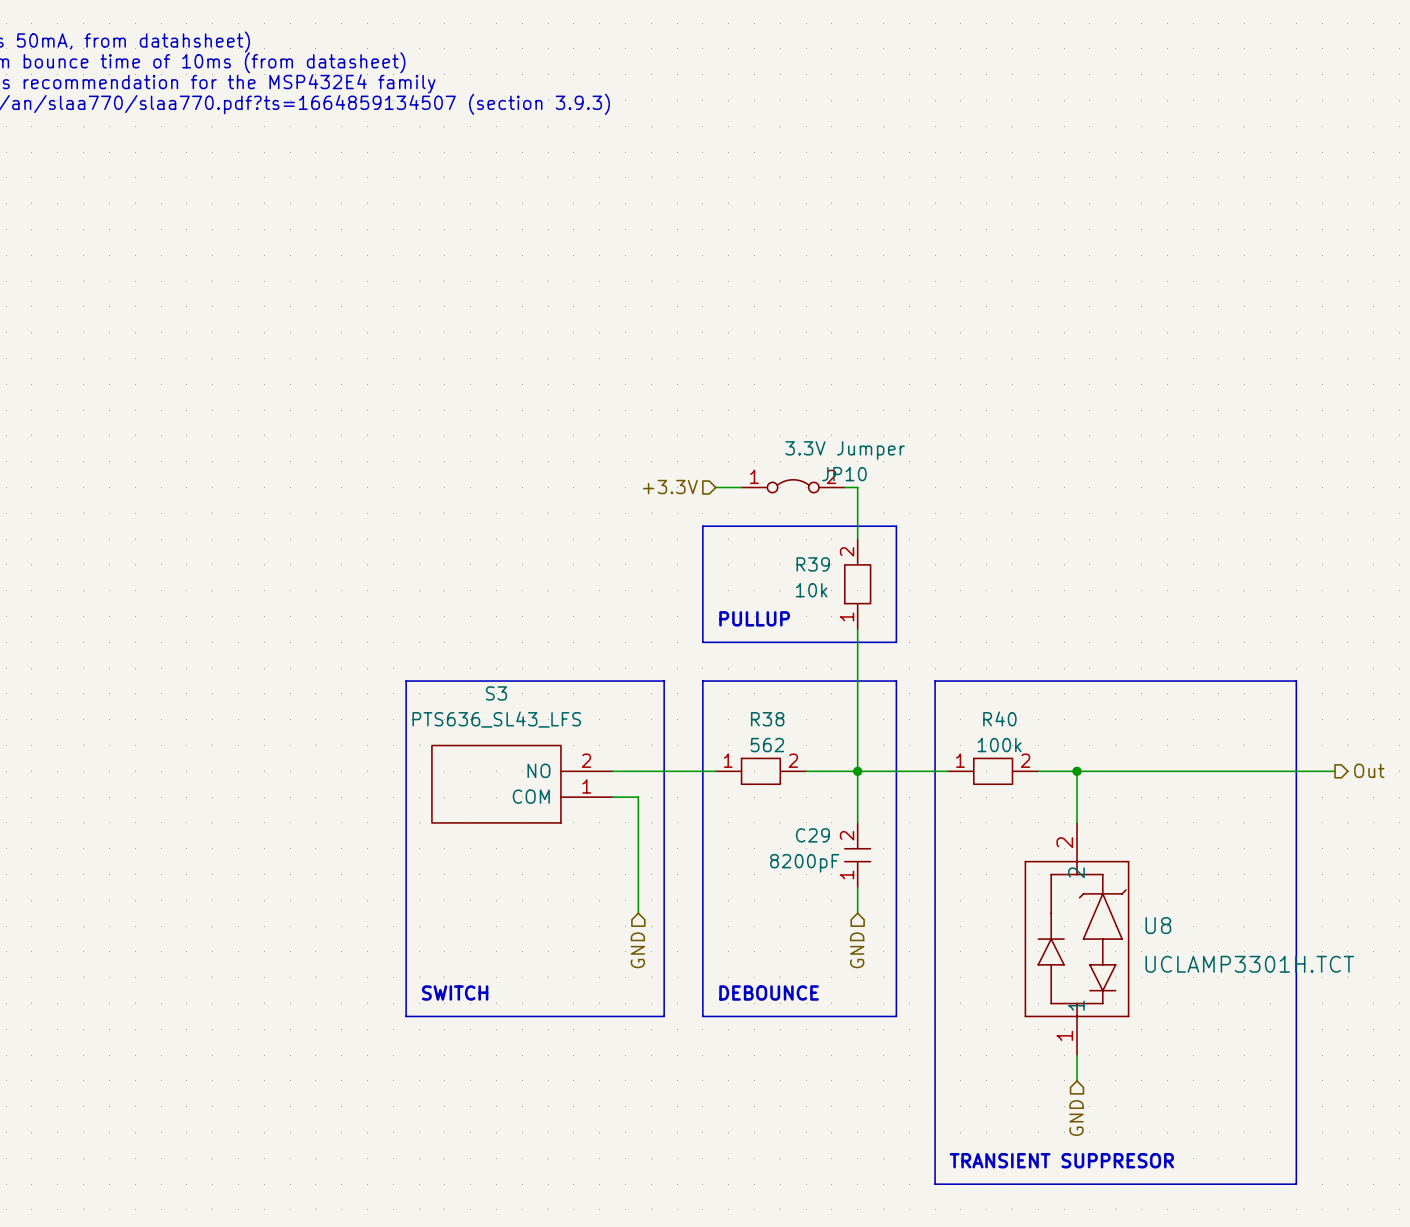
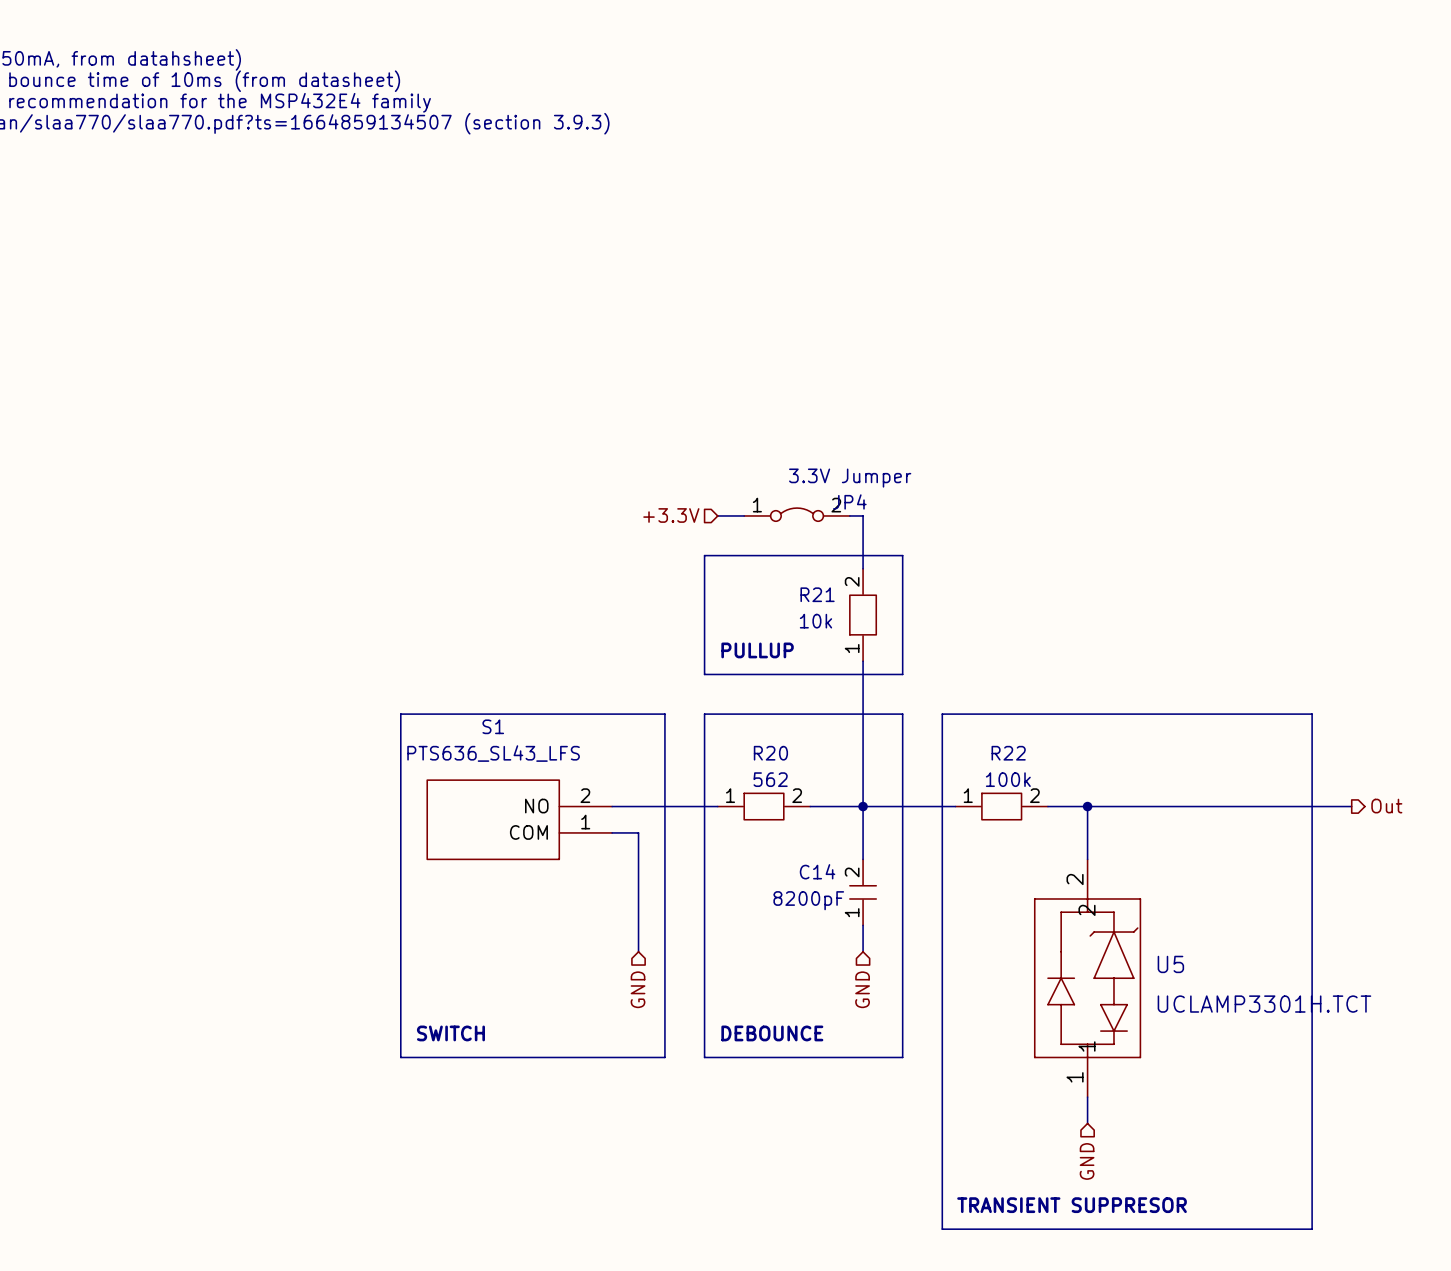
JP10 name: JP10 (844, 474) -> JP4 (849, 501)
R39 name: R39 (813, 564) -> R21 (817, 594)
S3 name: S3 (496, 693) -> S1 (493, 726)
R40 name: R40 (999, 718) -> R22 (1008, 753)
R38 name: R38 (767, 719) -> R20 (770, 753)
C29 name: C29 (812, 835) -> C14 (817, 871)
U8 name: U8 (1158, 925) -> U5 (1170, 964)

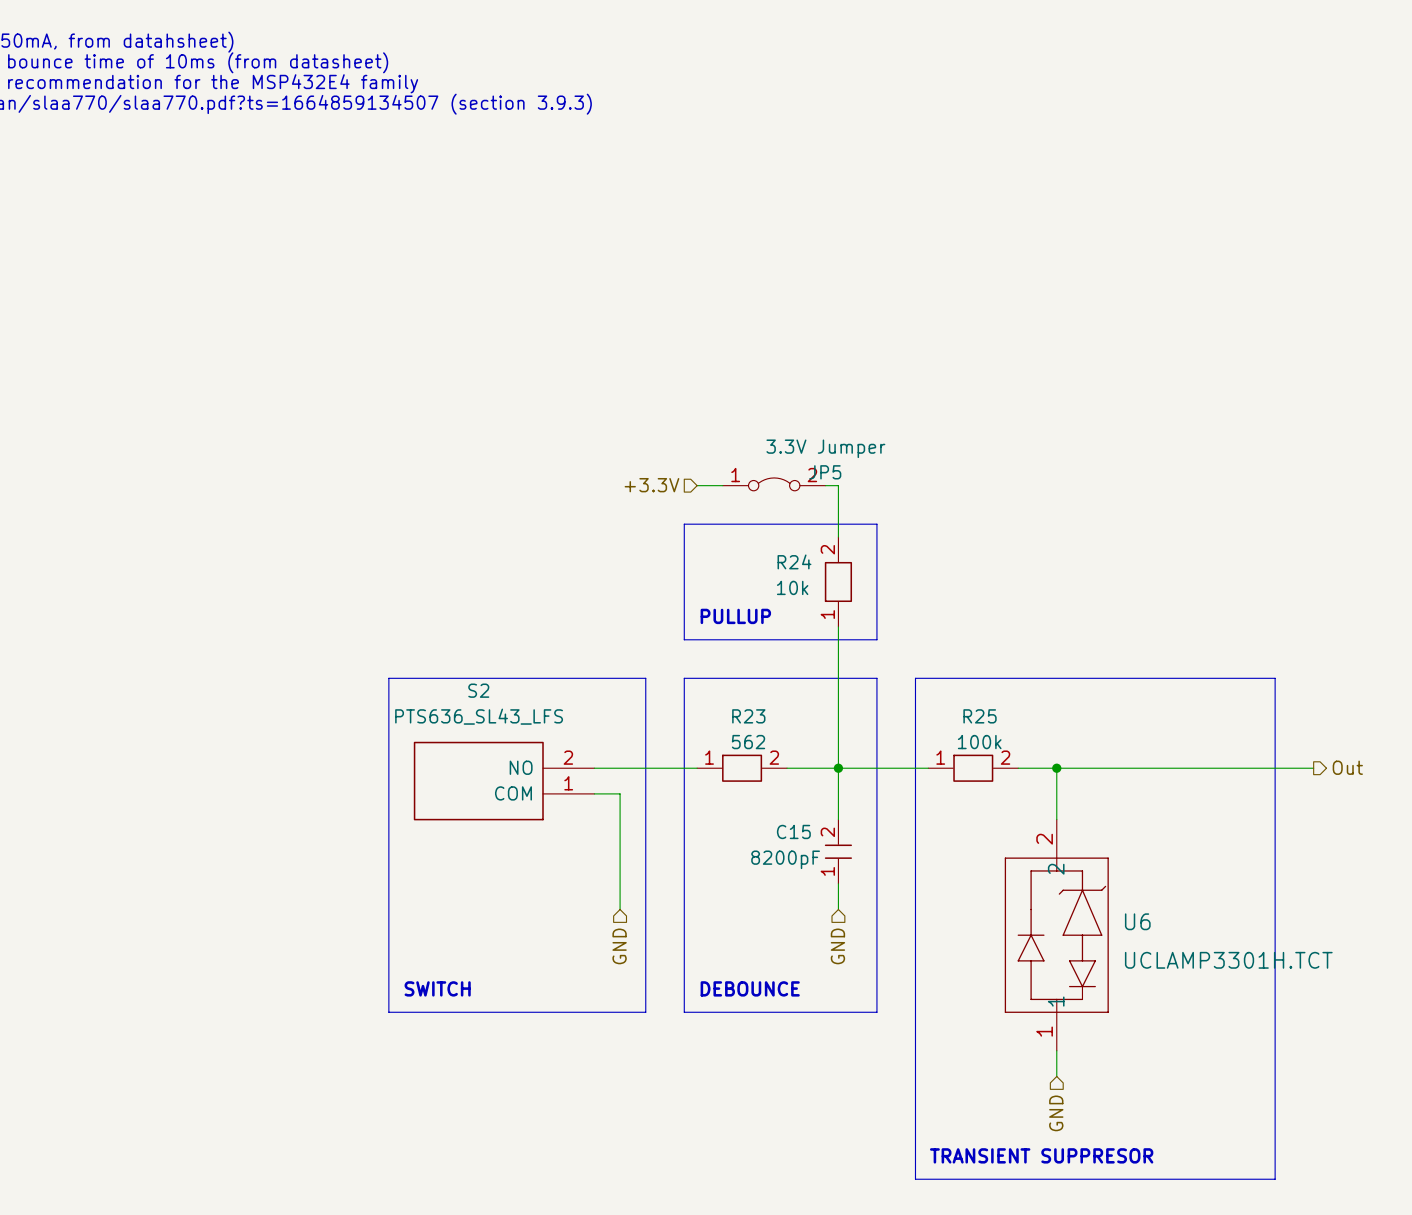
JP4 name: JP4 (849, 501) -> JP5 (825, 472)
R21 name: R21 (817, 594) -> R24 (794, 561)
S1 name: S1 (493, 726) -> S2 (478, 690)
R20 name: R20 (770, 753) -> R23 (748, 716)
R22 name: R22 (1008, 753) -> R25 (980, 716)
C14 name: C14 (817, 871) -> C15 (793, 831)
U5 name: U5 (1170, 964) -> U6 (1137, 921)

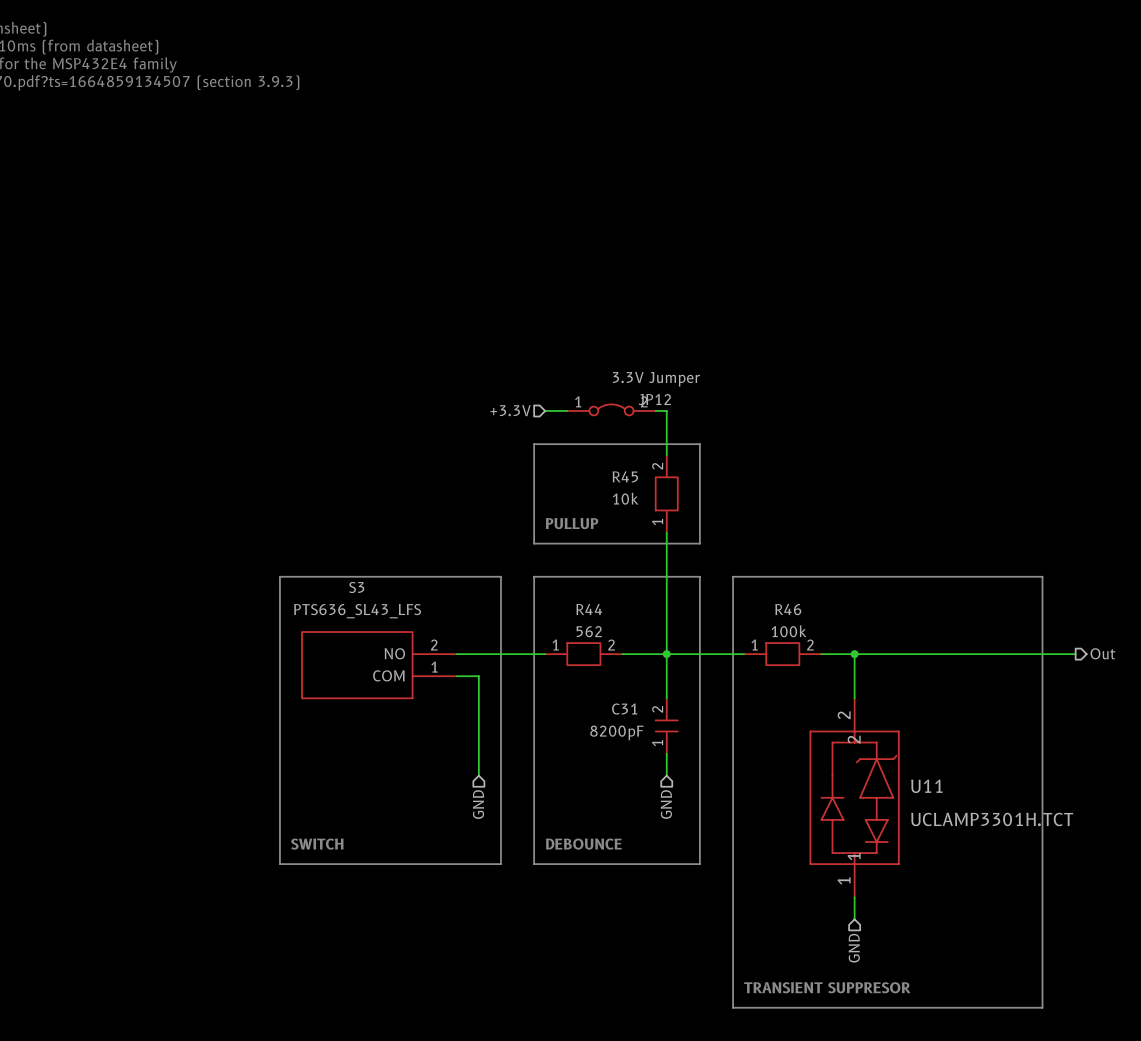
JP5 name: JP5 (825, 472) -> JP12 (654, 399)
R24 name: R24 (794, 561) -> R45 (625, 476)
S2 name: S2 (478, 690) -> S3 (356, 587)
R23 name: R23 (748, 716) -> R44 (589, 609)
R25 name: R25 (980, 716) -> R46 (788, 609)
C15 name: C15 (793, 831) -> C31 (624, 709)
U6 name: U6 (1137, 921) -> U11 (926, 786)

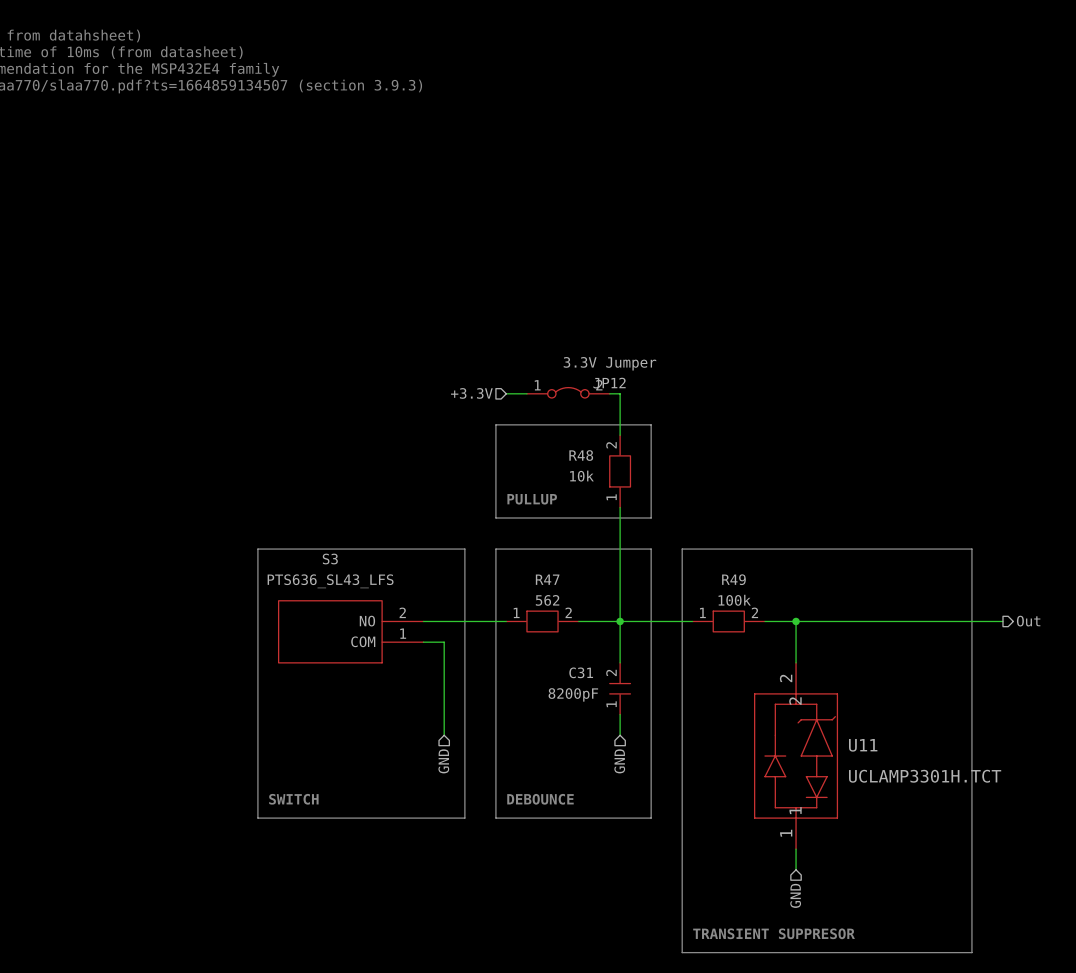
R45 name: R45 (625, 476) -> R48 (581, 455)
R44 name: R44 (589, 609) -> R47 (547, 579)
R46 name: R46 (788, 609) -> R49 (733, 579)

